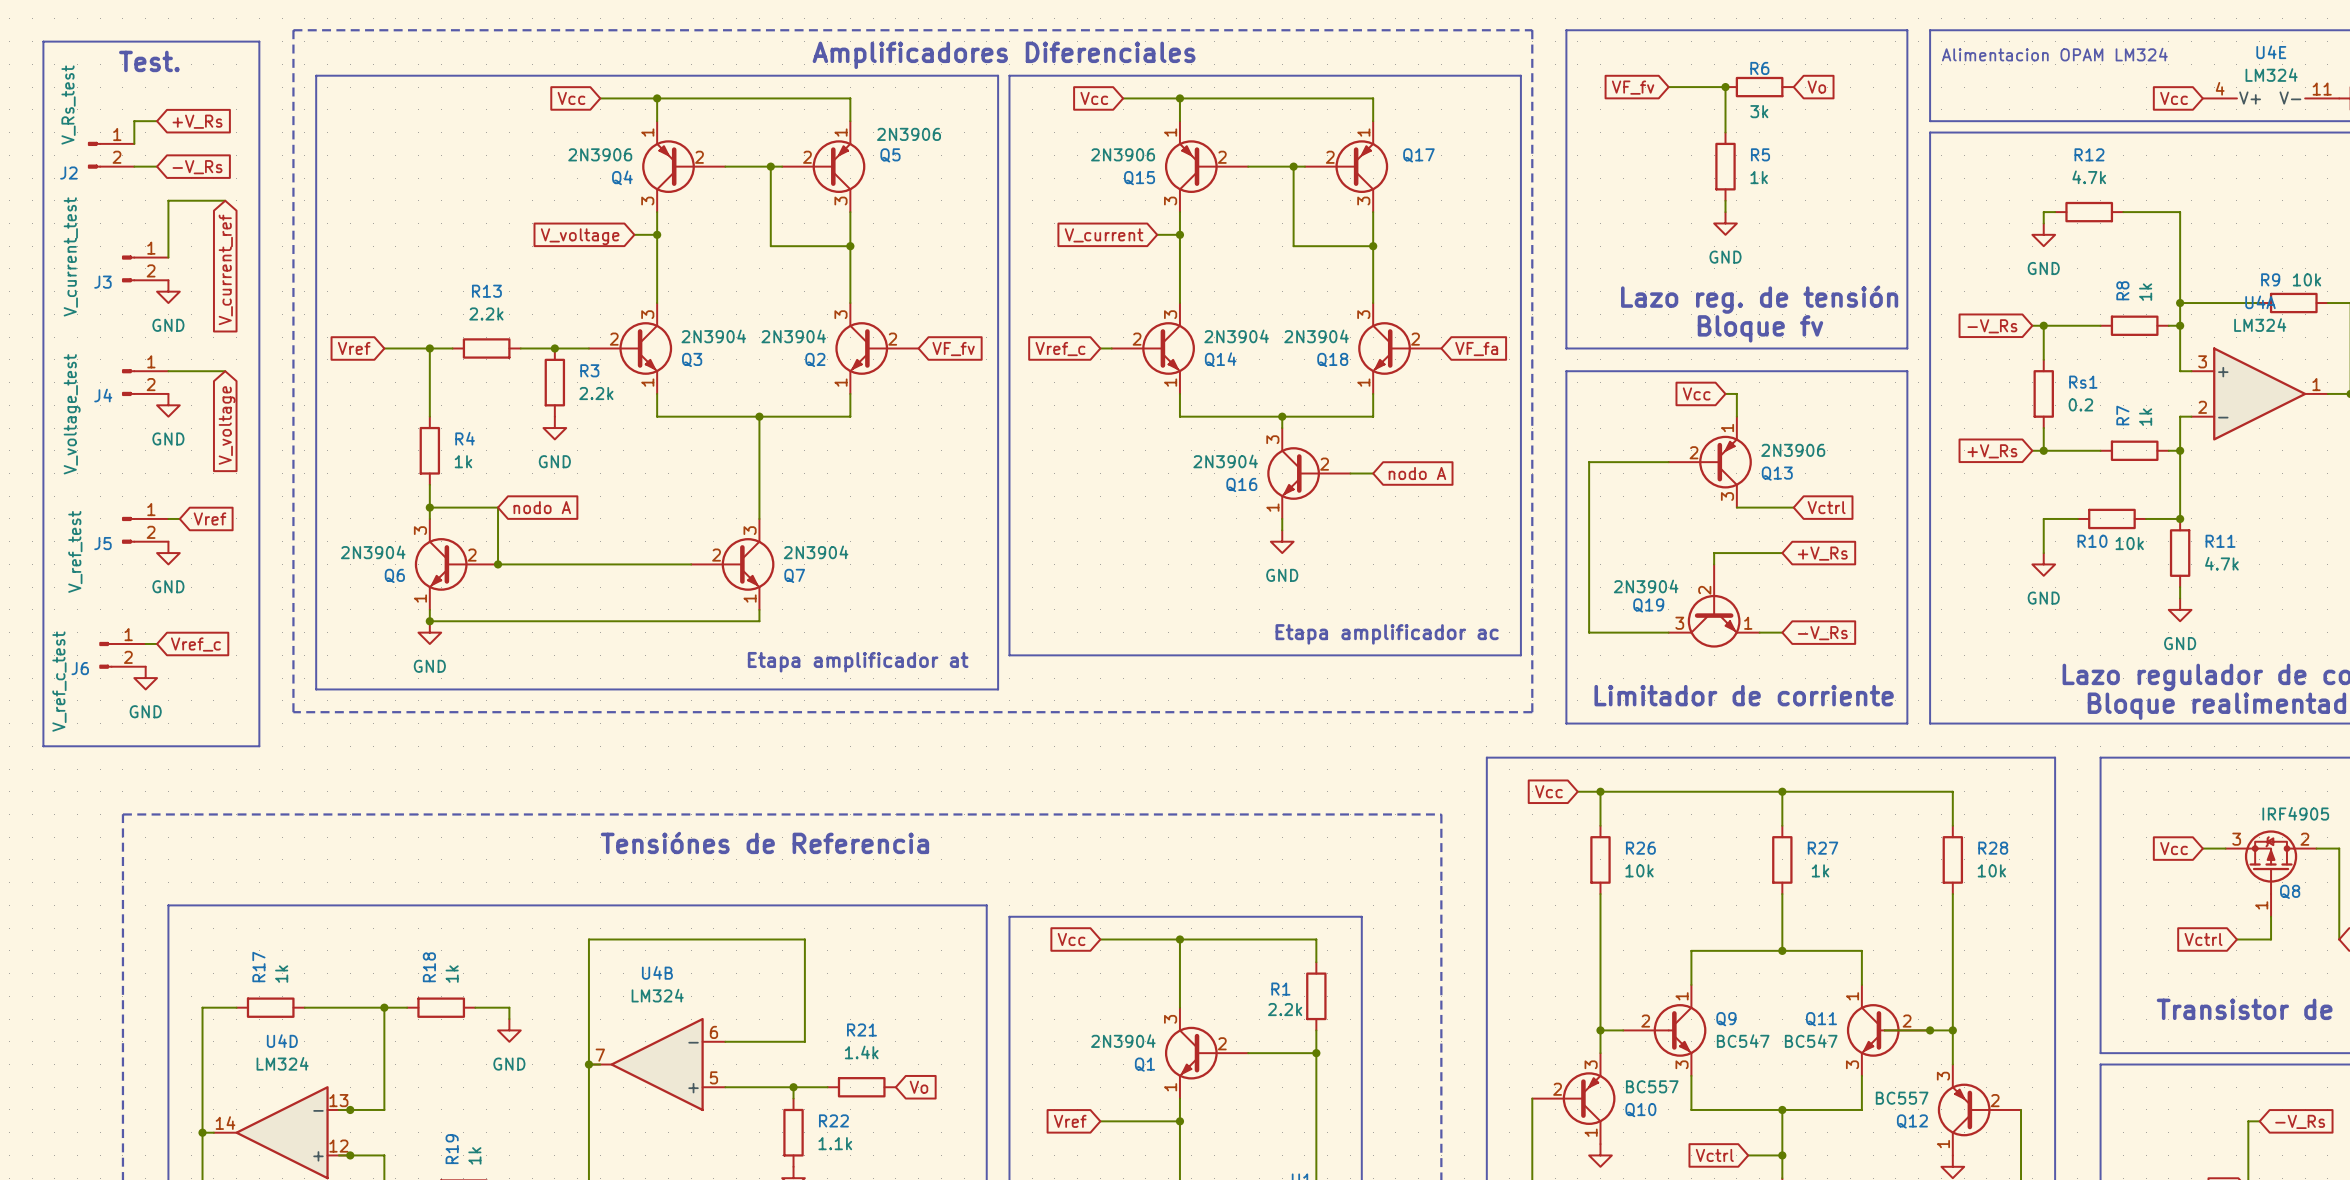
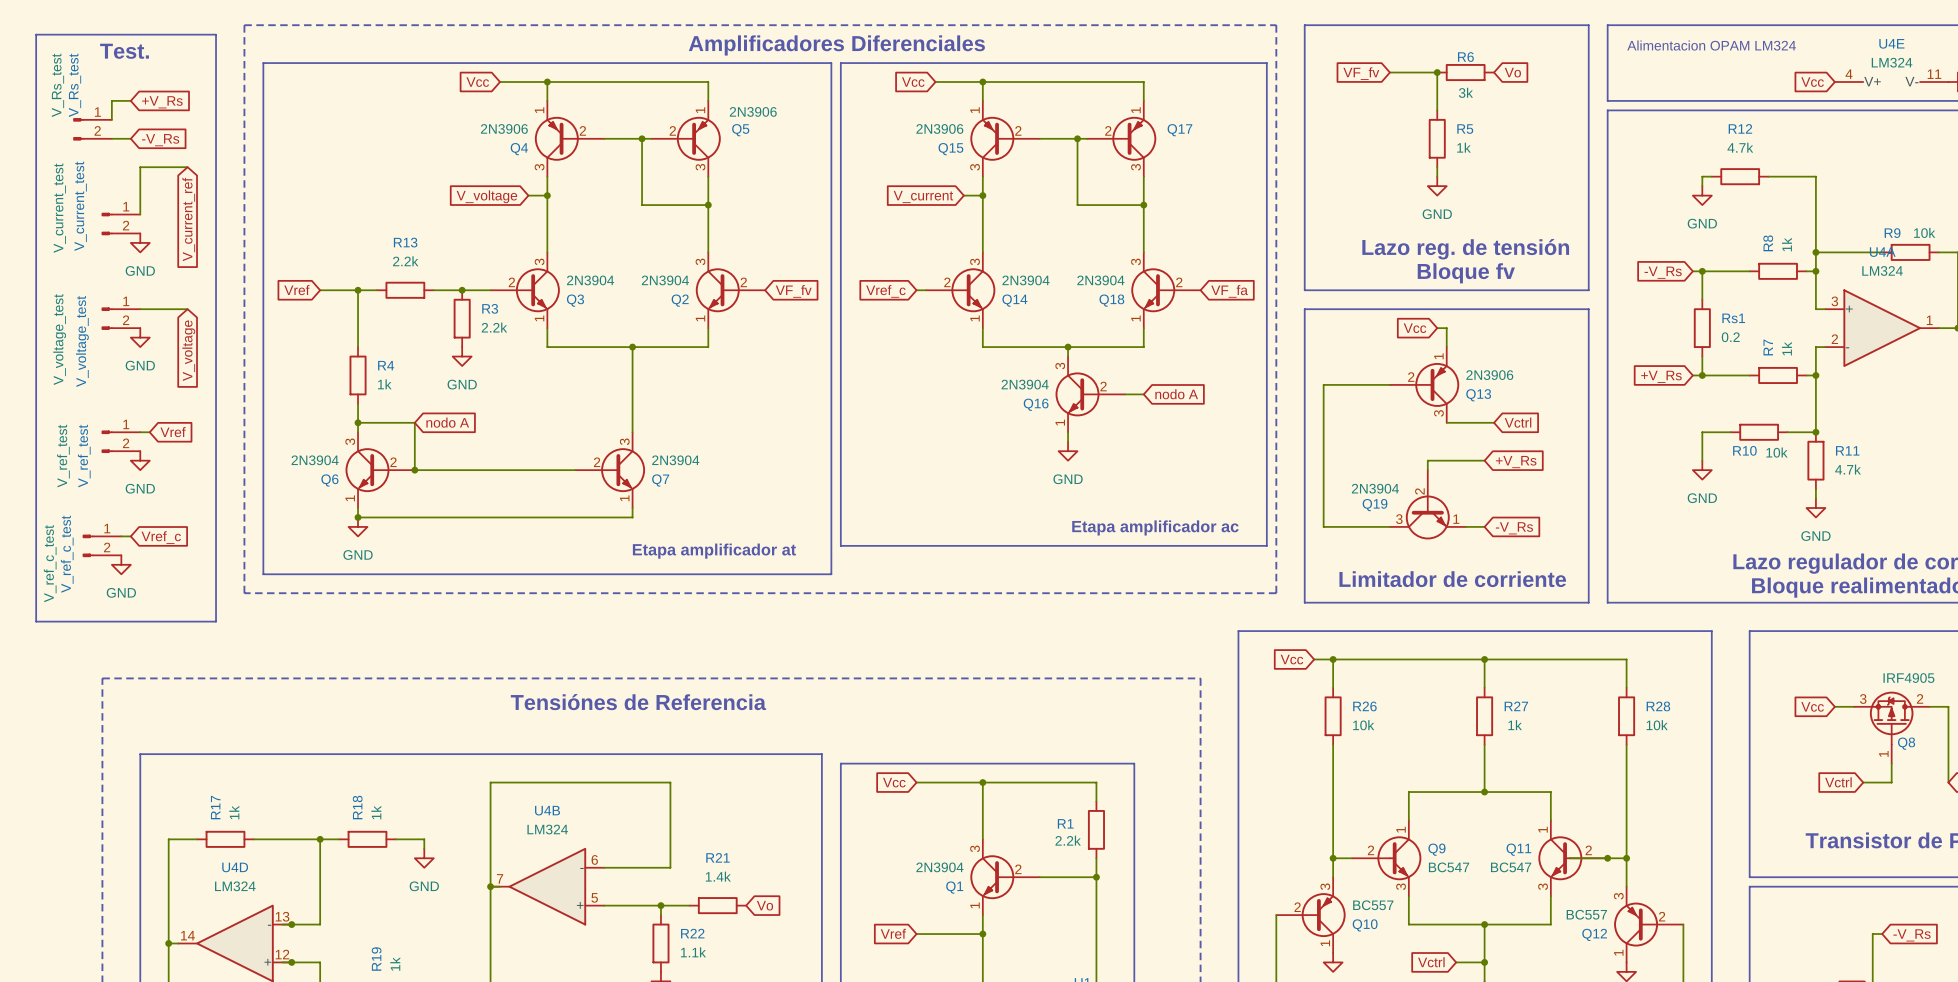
J2 name: J2 (68, 173) -> V_Rs_test (75, 85)
J3 name: J3 (102, 282) -> V_current_test (80, 206)
J4 name: J4 (103, 395) -> V_voltage_test (82, 341)
J5 name: J5 (102, 543) -> V_ref_test (84, 456)
J6 name: J6 (80, 668) -> V_ref_c_test (67, 554)

